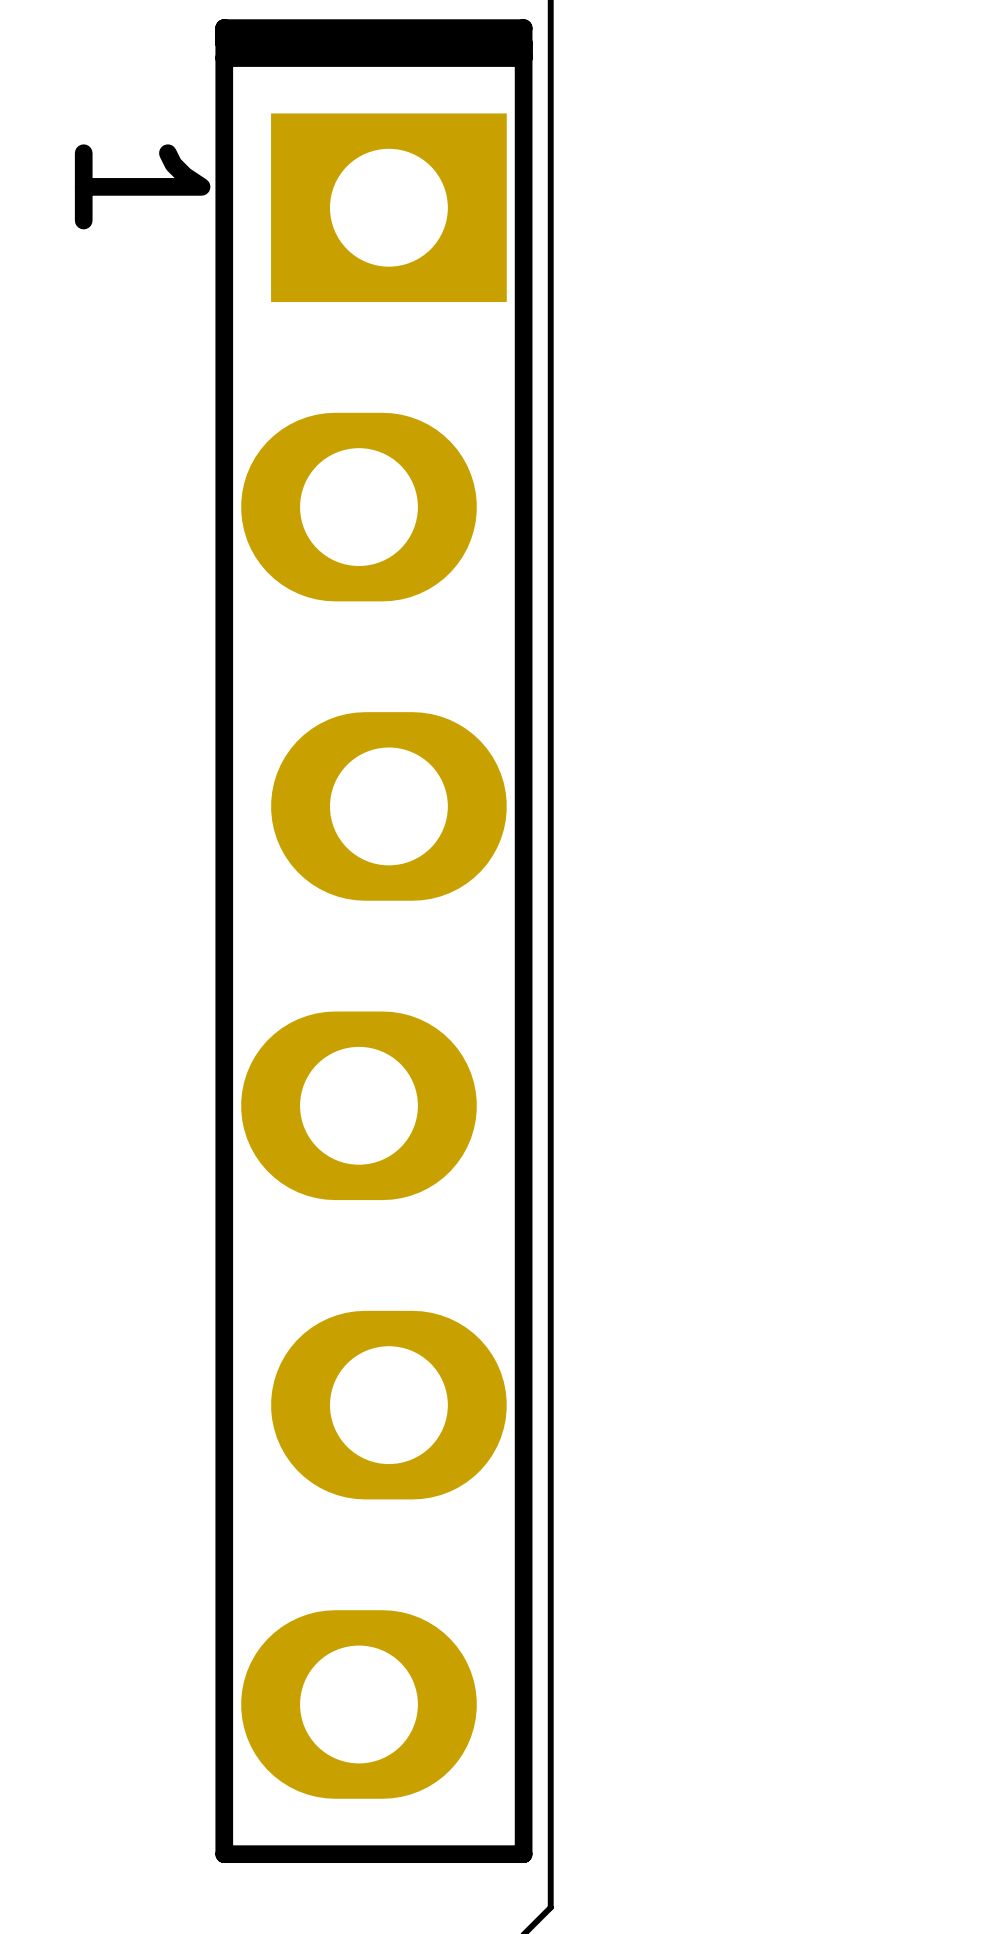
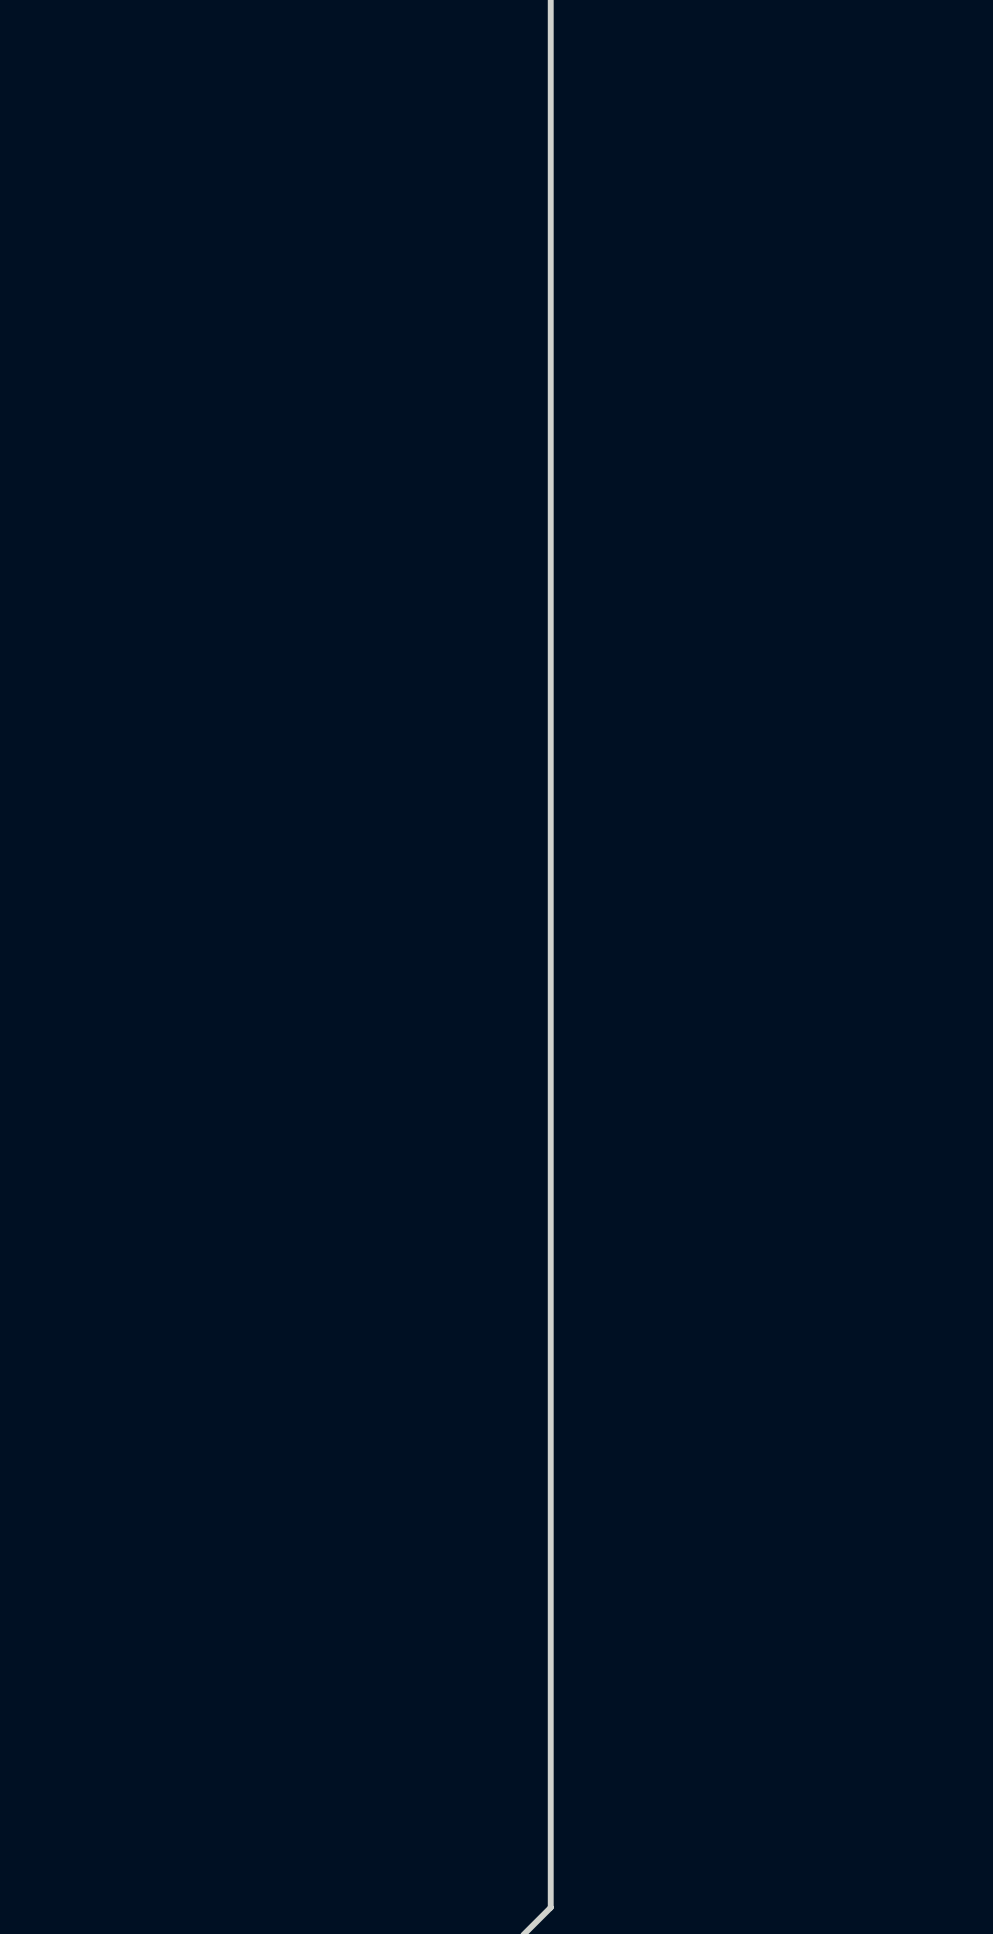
part: (373, 941) -> none

